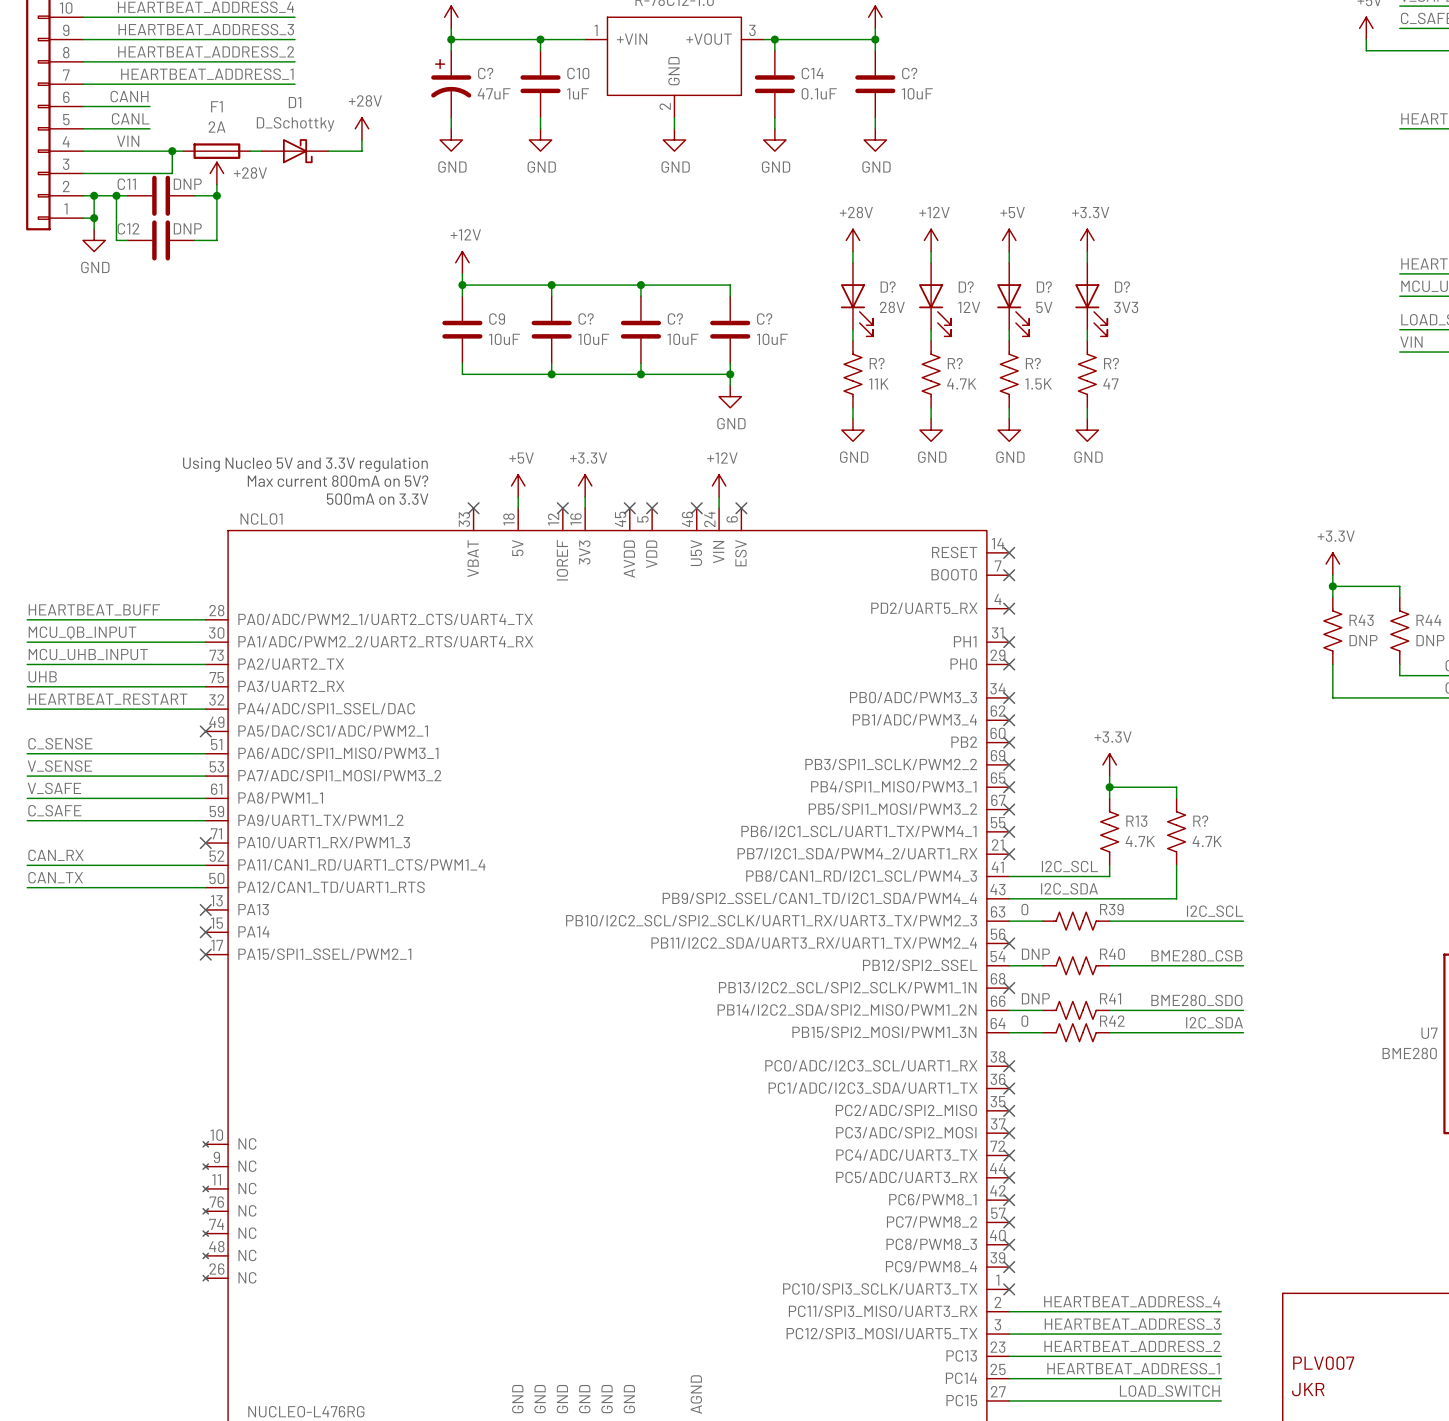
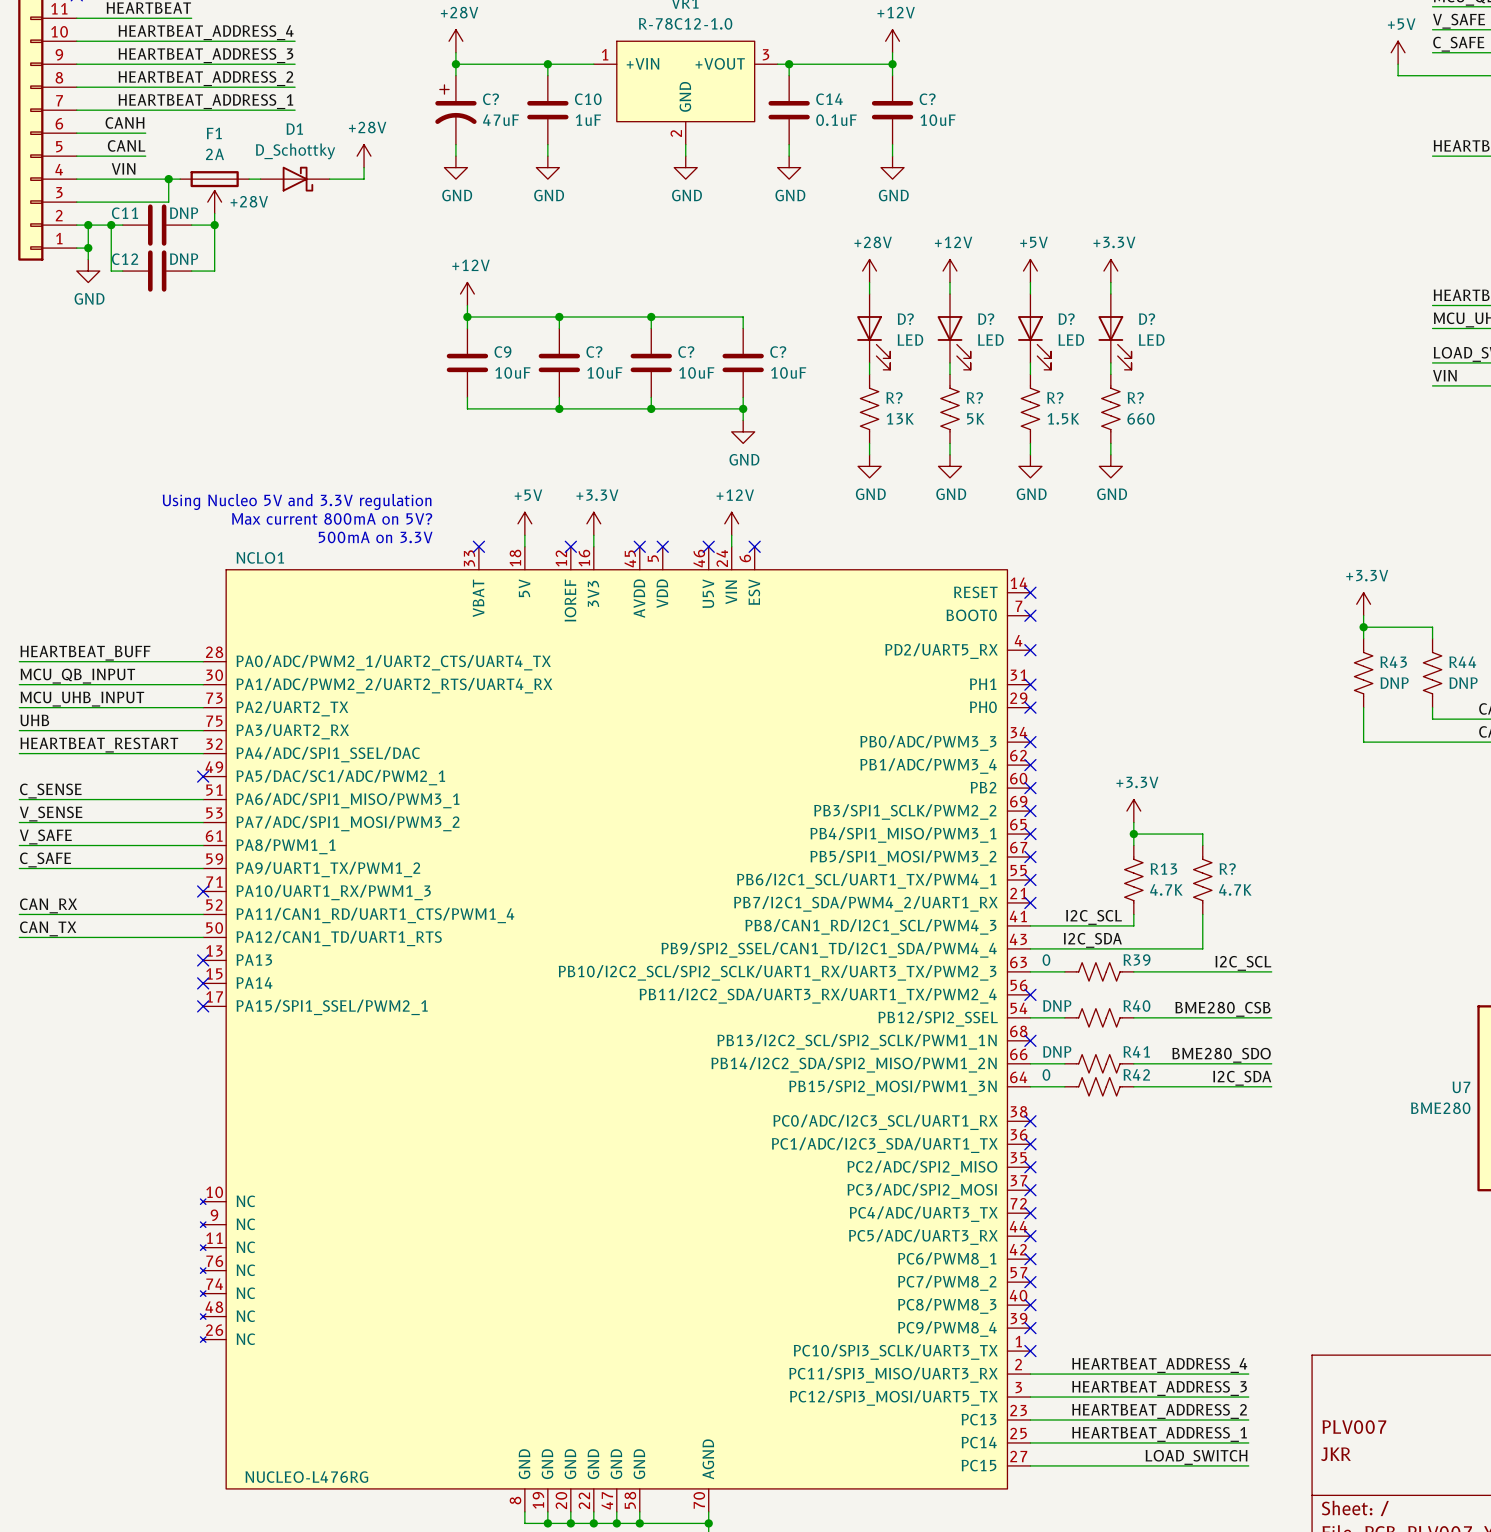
D? value: 28V (892, 307) -> LED (910, 340)
D? value: 12V (969, 307) -> LED (990, 340)
D? value: 5V (1044, 307) -> LED (1071, 340)
D? value: 3V3 (1126, 307) -> LED (1151, 340)
R? value: 11K (878, 383) -> 13K (900, 418)
R? value: 4.7K (961, 383) -> 5K (975, 418)
R? value: 47 (1110, 383) -> 660 (1140, 418)

